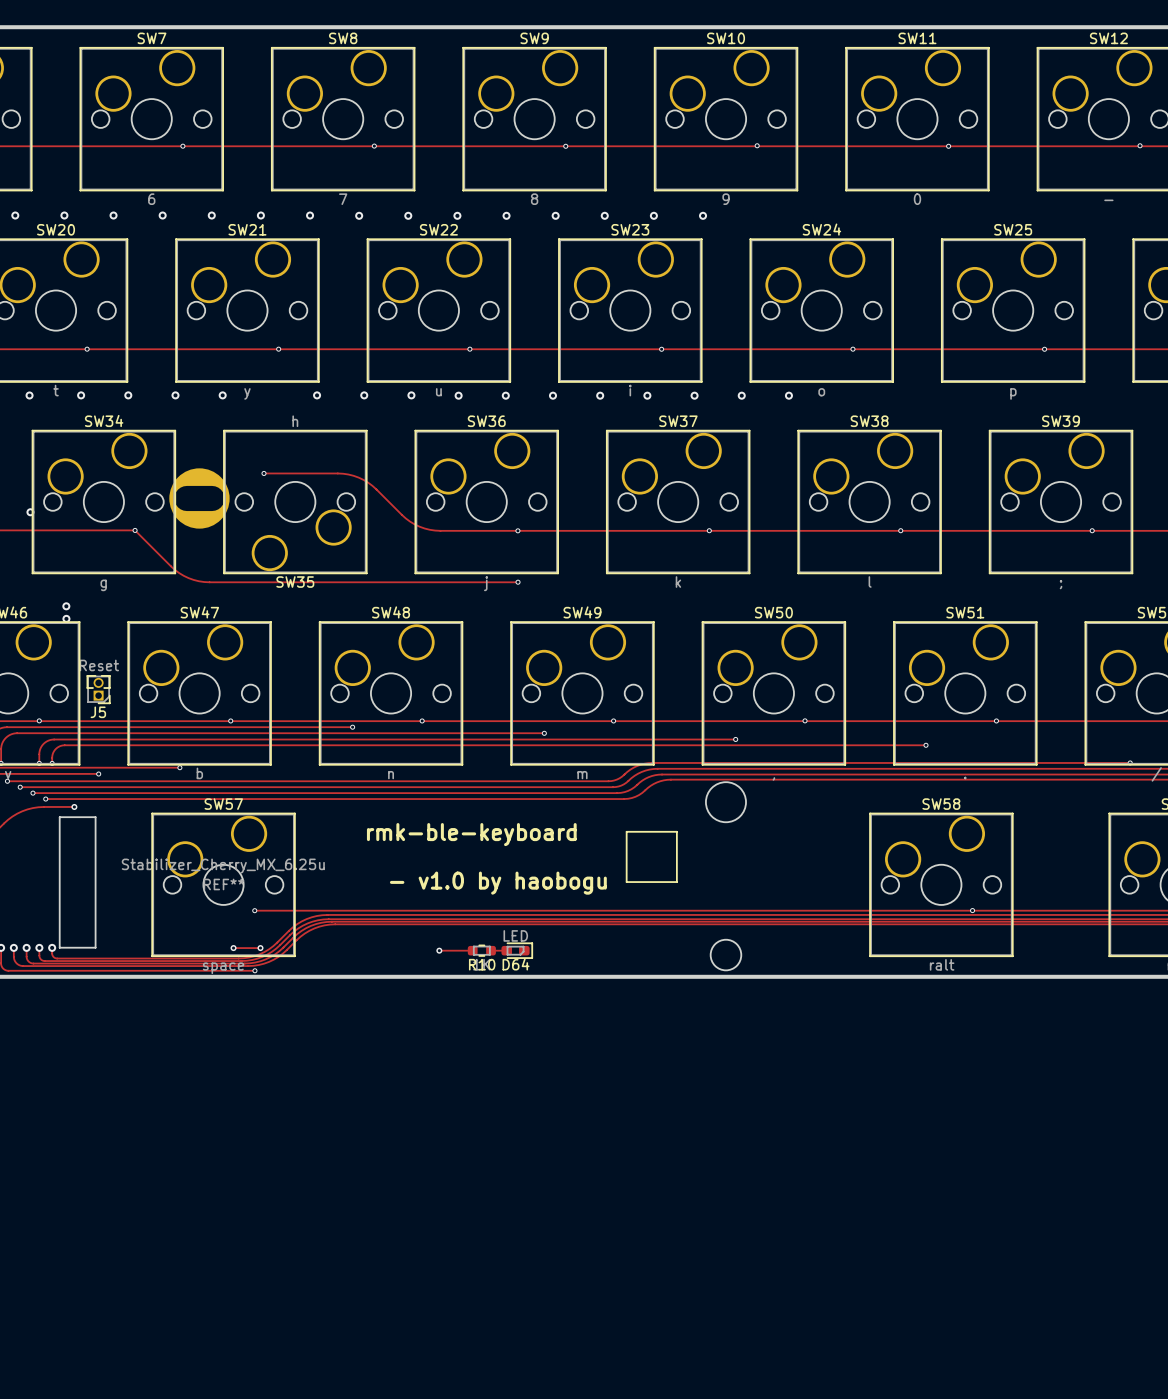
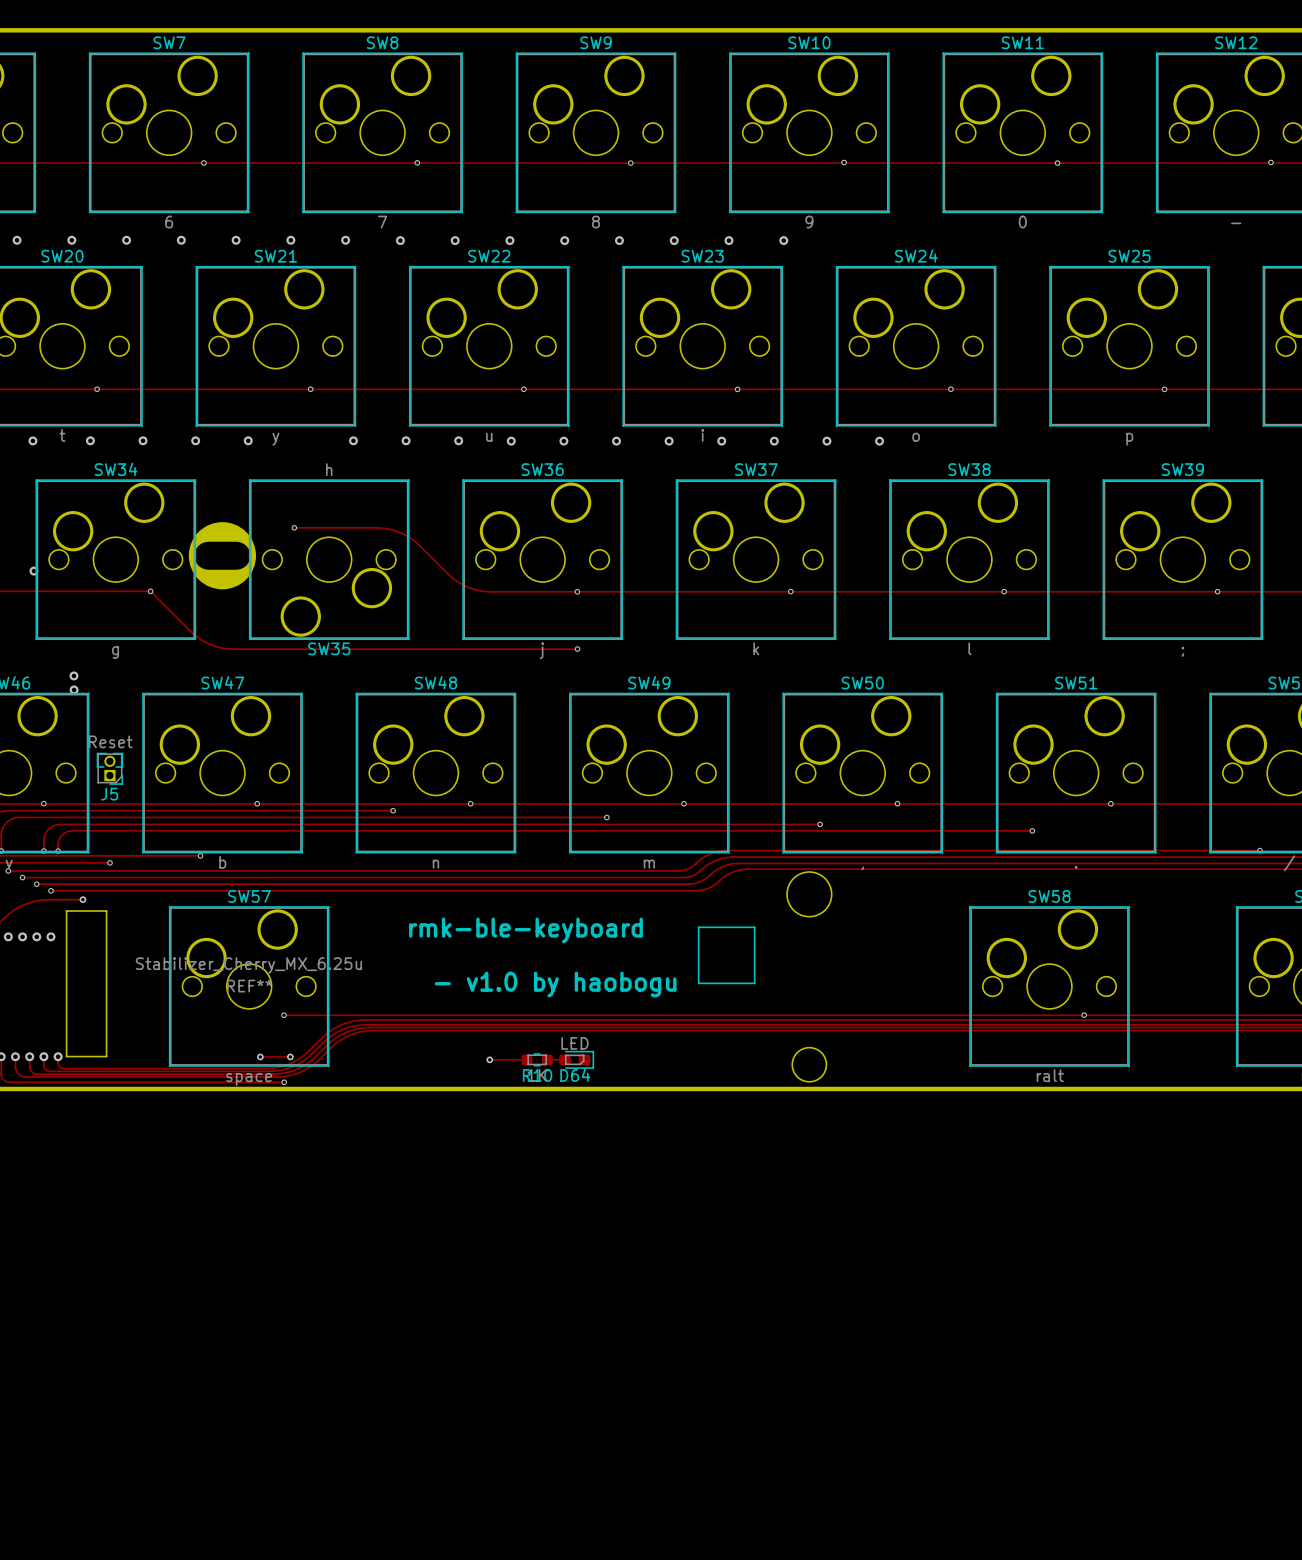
via: none -> (8, 936)
via: none -> (22, 936)
via: none -> (36, 936)
via: none -> (50, 936)

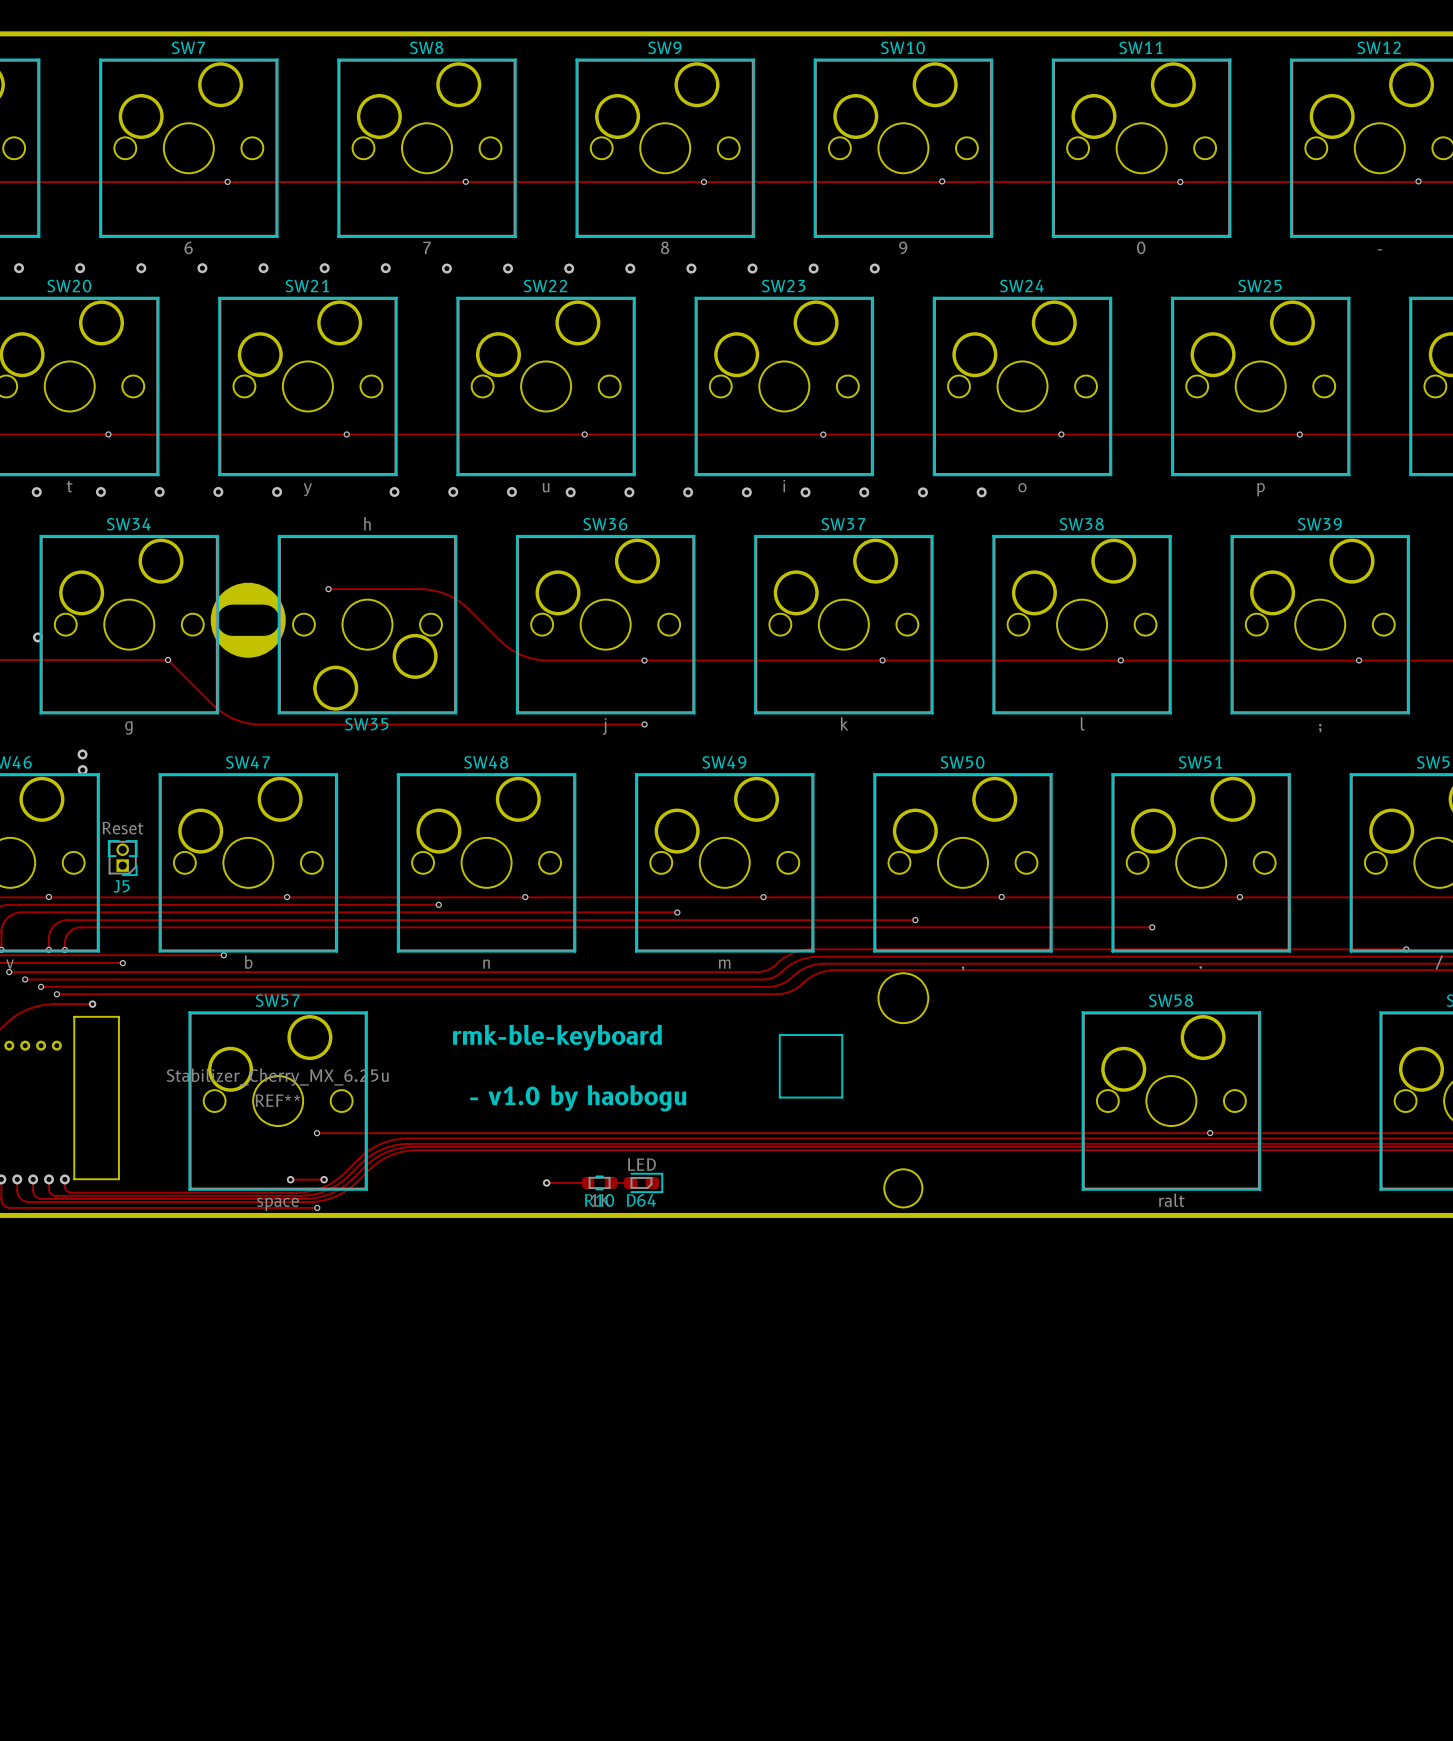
via: (8, 936) -> none
part: none -> (9, 1045)
via: (22, 936) -> none
part: none -> (25, 1045)
via: (36, 936) -> none
part: none -> (41, 1045)
via: (50, 936) -> none
part: none -> (56, 1045)

